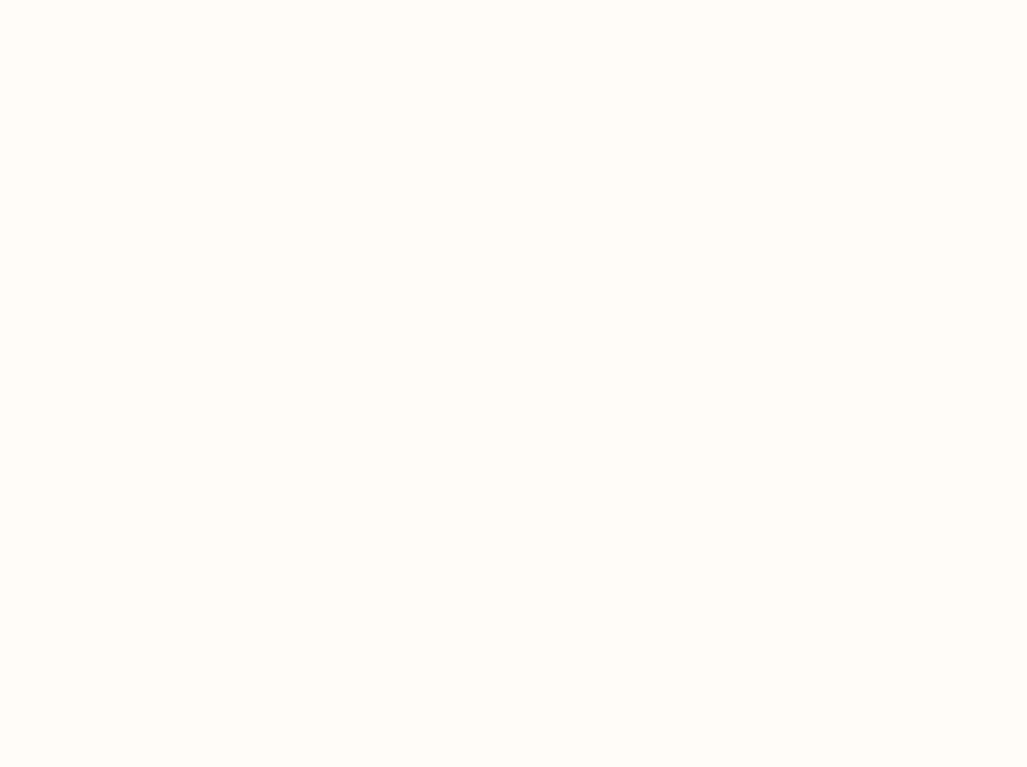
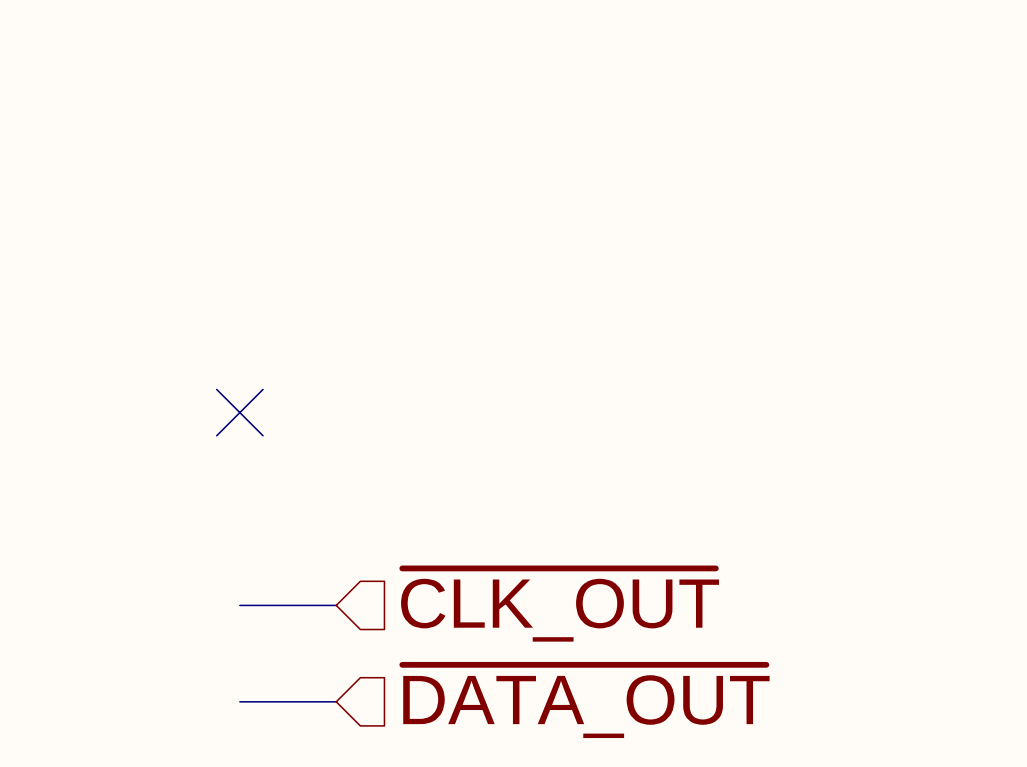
no-connect mark: none -> (239, 412)
wire: none -> (239, 605) (336, 605)
hierarchical label: none -> ~{CLK_OUT} (560, 605)
wire: none -> (239, 701) (336, 701)
hierarchical label: none -> ~{DATA_OUT} (585, 701)

